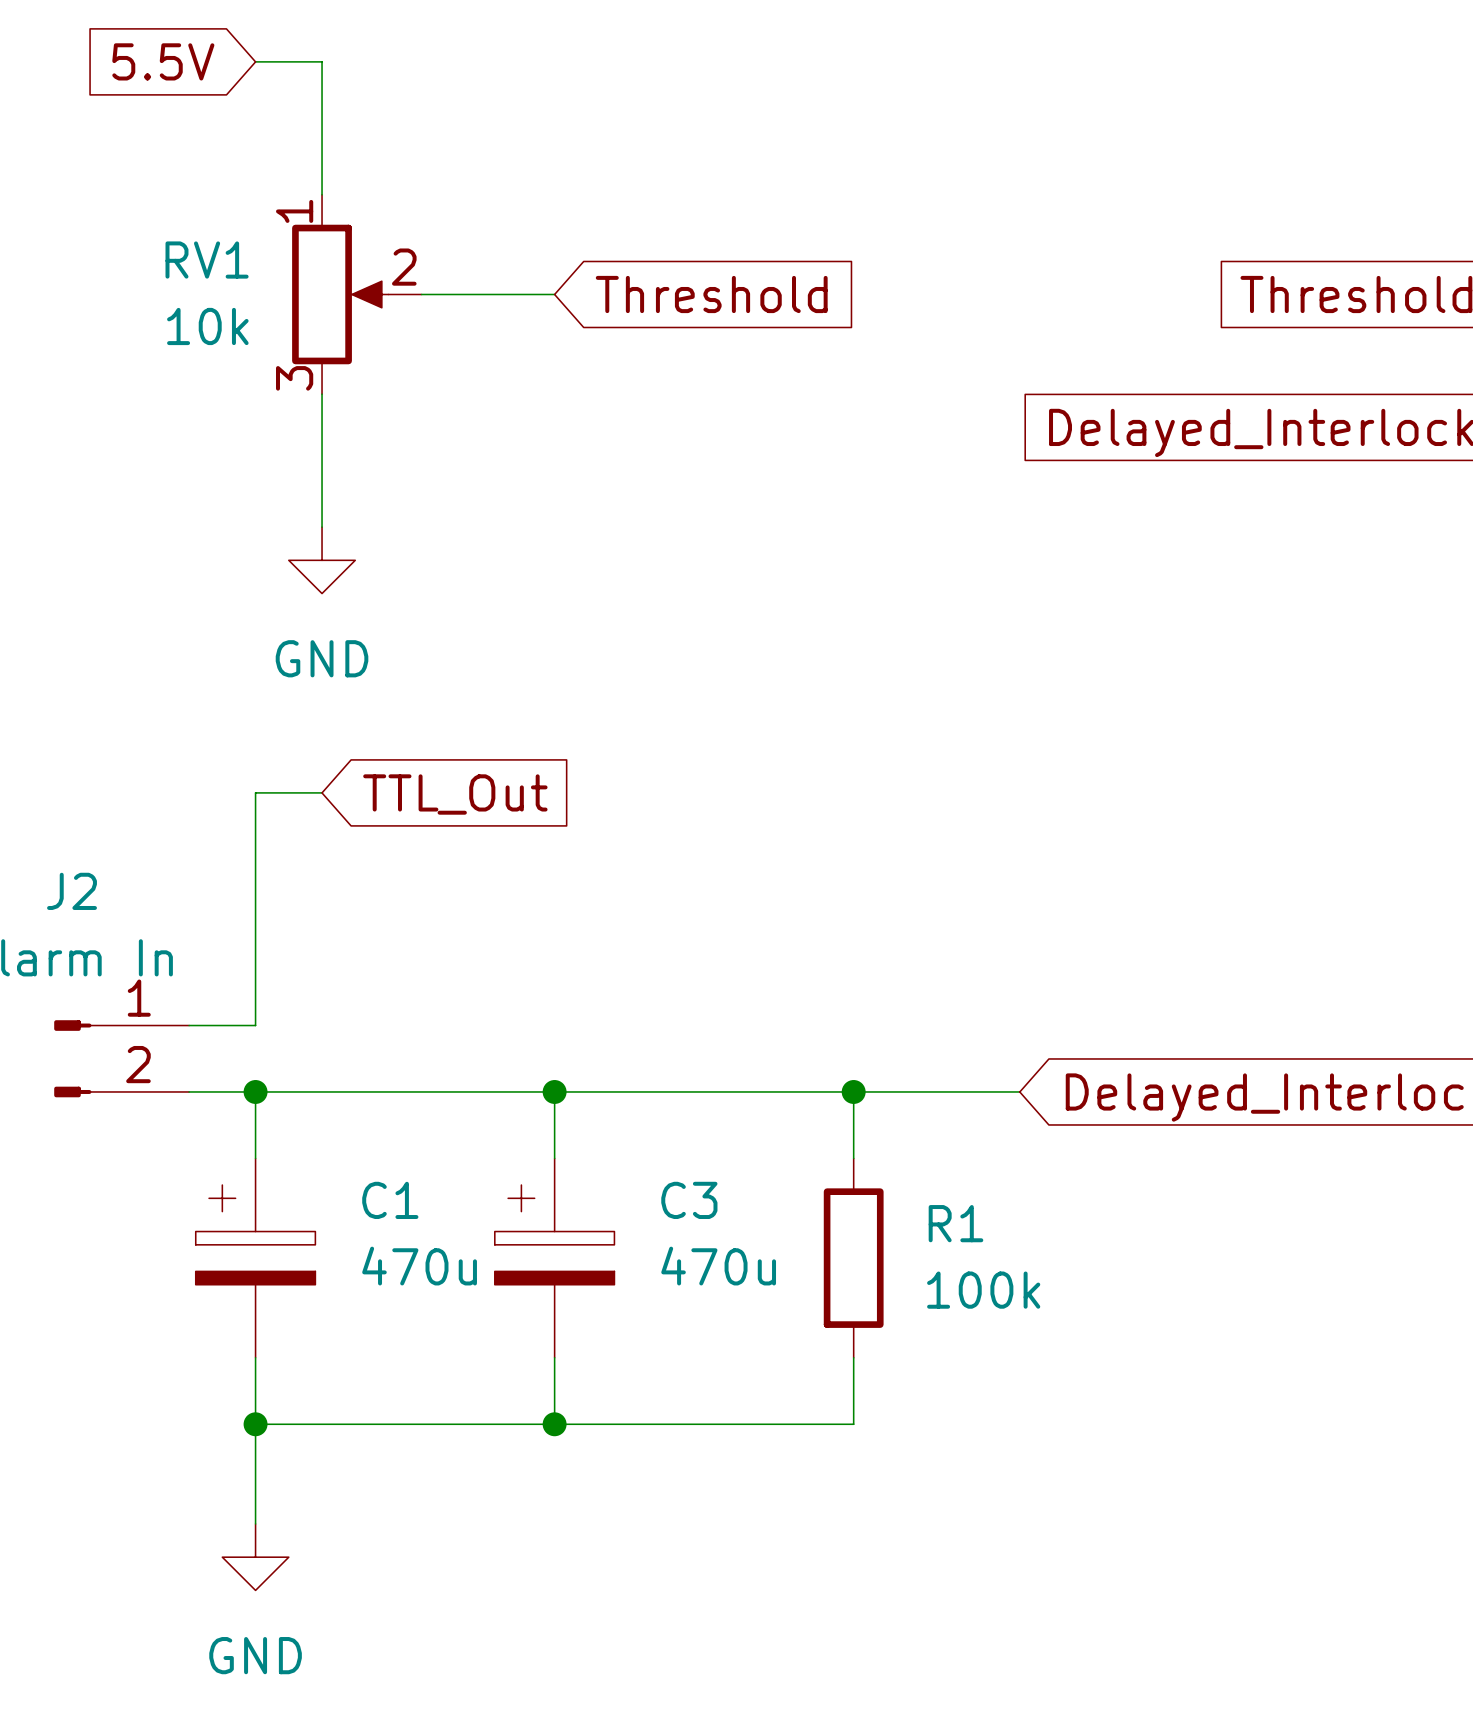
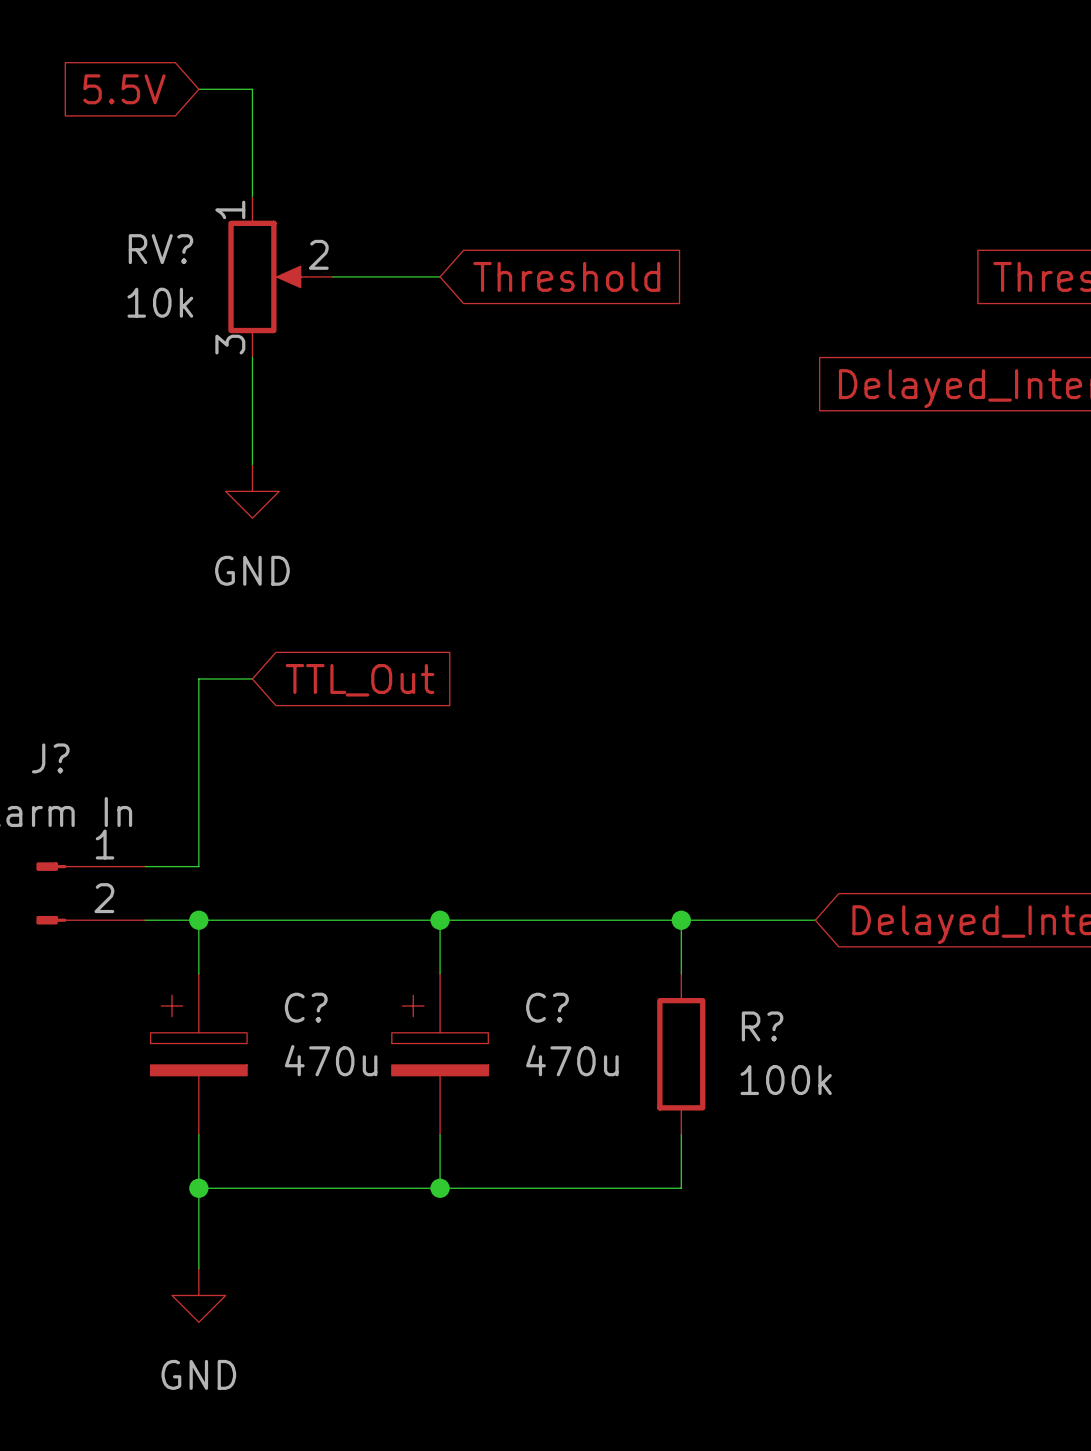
RV1 name: RV1 (207, 260) -> RV? (160, 249)
J2 name: J2 (72, 891) -> J? (50, 758)
C1 name: C1 (390, 1200) -> C? (306, 1007)
C3 name: C3 (689, 1200) -> C? (547, 1007)
R1 name: R1 (955, 1223) -> R? (762, 1026)

